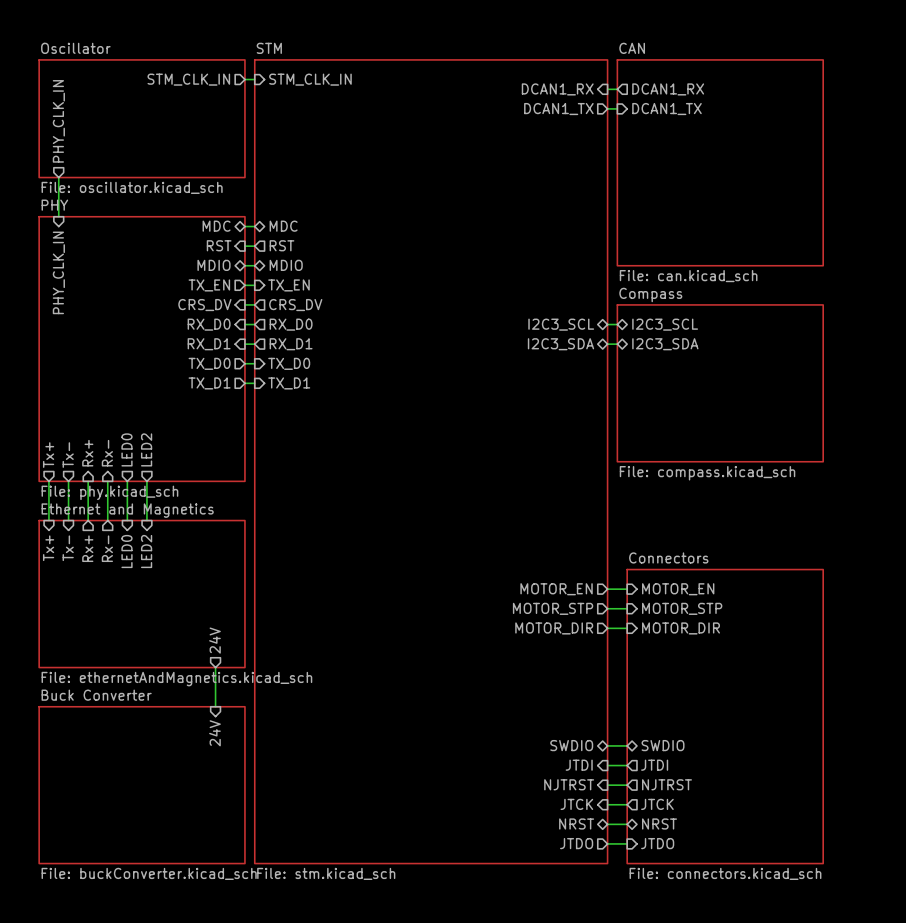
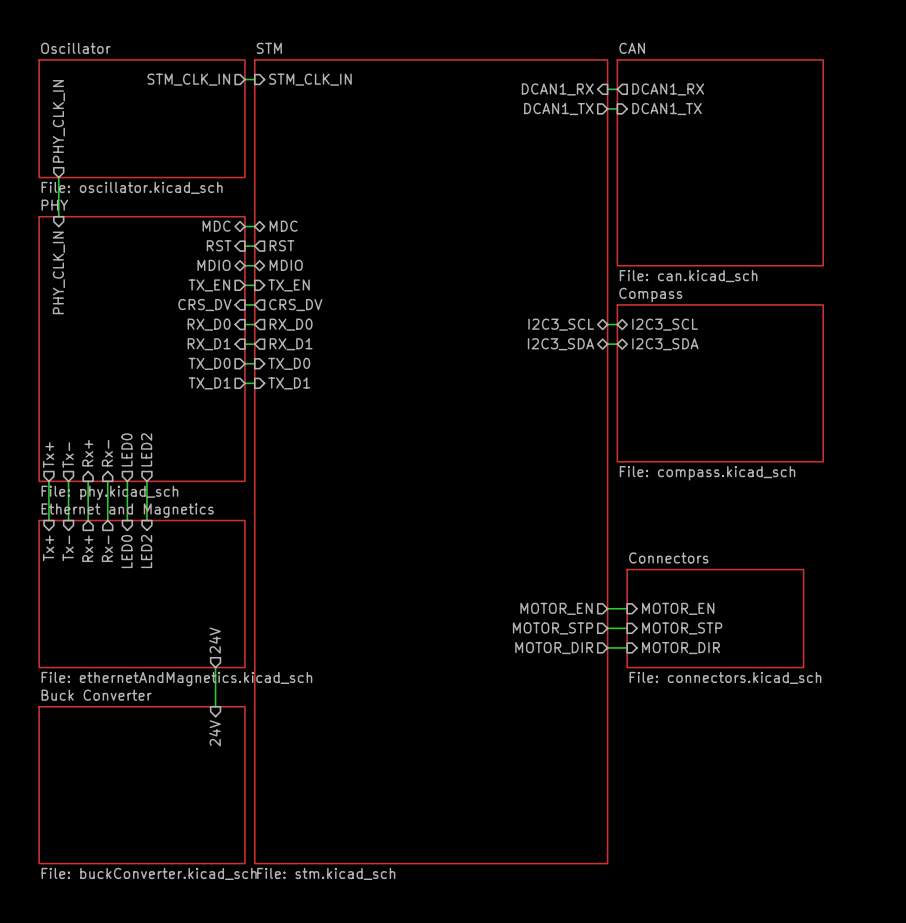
sheet pin: MOTOR_EN (556, 589) -> none
wire: (607, 589) (627, 589) -> (607, 647) (627, 647)
sheet pin: MOTOR_EN (678, 589) -> none
sheet pin: MOTOR_STP (553, 608) -> MOTOR_EN (556, 608)
sheet pin: MOTOR_STP (682, 608) -> MOTOR_EN (678, 608)
sheet Connectors: none -> File: connectors.kicad_sch (715, 618)
sheet pin: MOTOR_DIR (554, 628) -> MOTOR_STP (553, 628)
sheet pin: MOTOR_DIR (680, 628) -> MOTOR_STP (682, 628)
sheet pin: none -> MOTOR_DIR (554, 648)
sheet pin: none -> MOTOR_DIR (680, 648)
sheet Connectors: File: connectors.kicad_sch (725, 716) -> none
sheet pin: SWDIO (571, 745) -> none
wire: (607, 745) (627, 745) -> none
sheet pin: SWDIO (663, 745) -> none
sheet pin: JTDI (579, 765) -> none
wire: (607, 765) (627, 765) -> none
sheet pin: JTDI (654, 765) -> none
sheet pin: NJTRST (569, 784) -> none
sheet pin: NJTRST (666, 784) -> none
wire: (607, 785) (627, 785) -> none
sheet pin: JTCK (576, 804) -> none
wire: (607, 804) (627, 804) -> none
sheet pin: JTCK (657, 804) -> none
sheet pin: NRST (576, 823) -> none
sheet pin: NRST (659, 823) -> none
wire: (607, 824) (627, 824) -> none
sheet pin: JTDO (576, 843) -> none
wire: (607, 843) (627, 843) -> none
sheet pin: JTDO (657, 843) -> none

